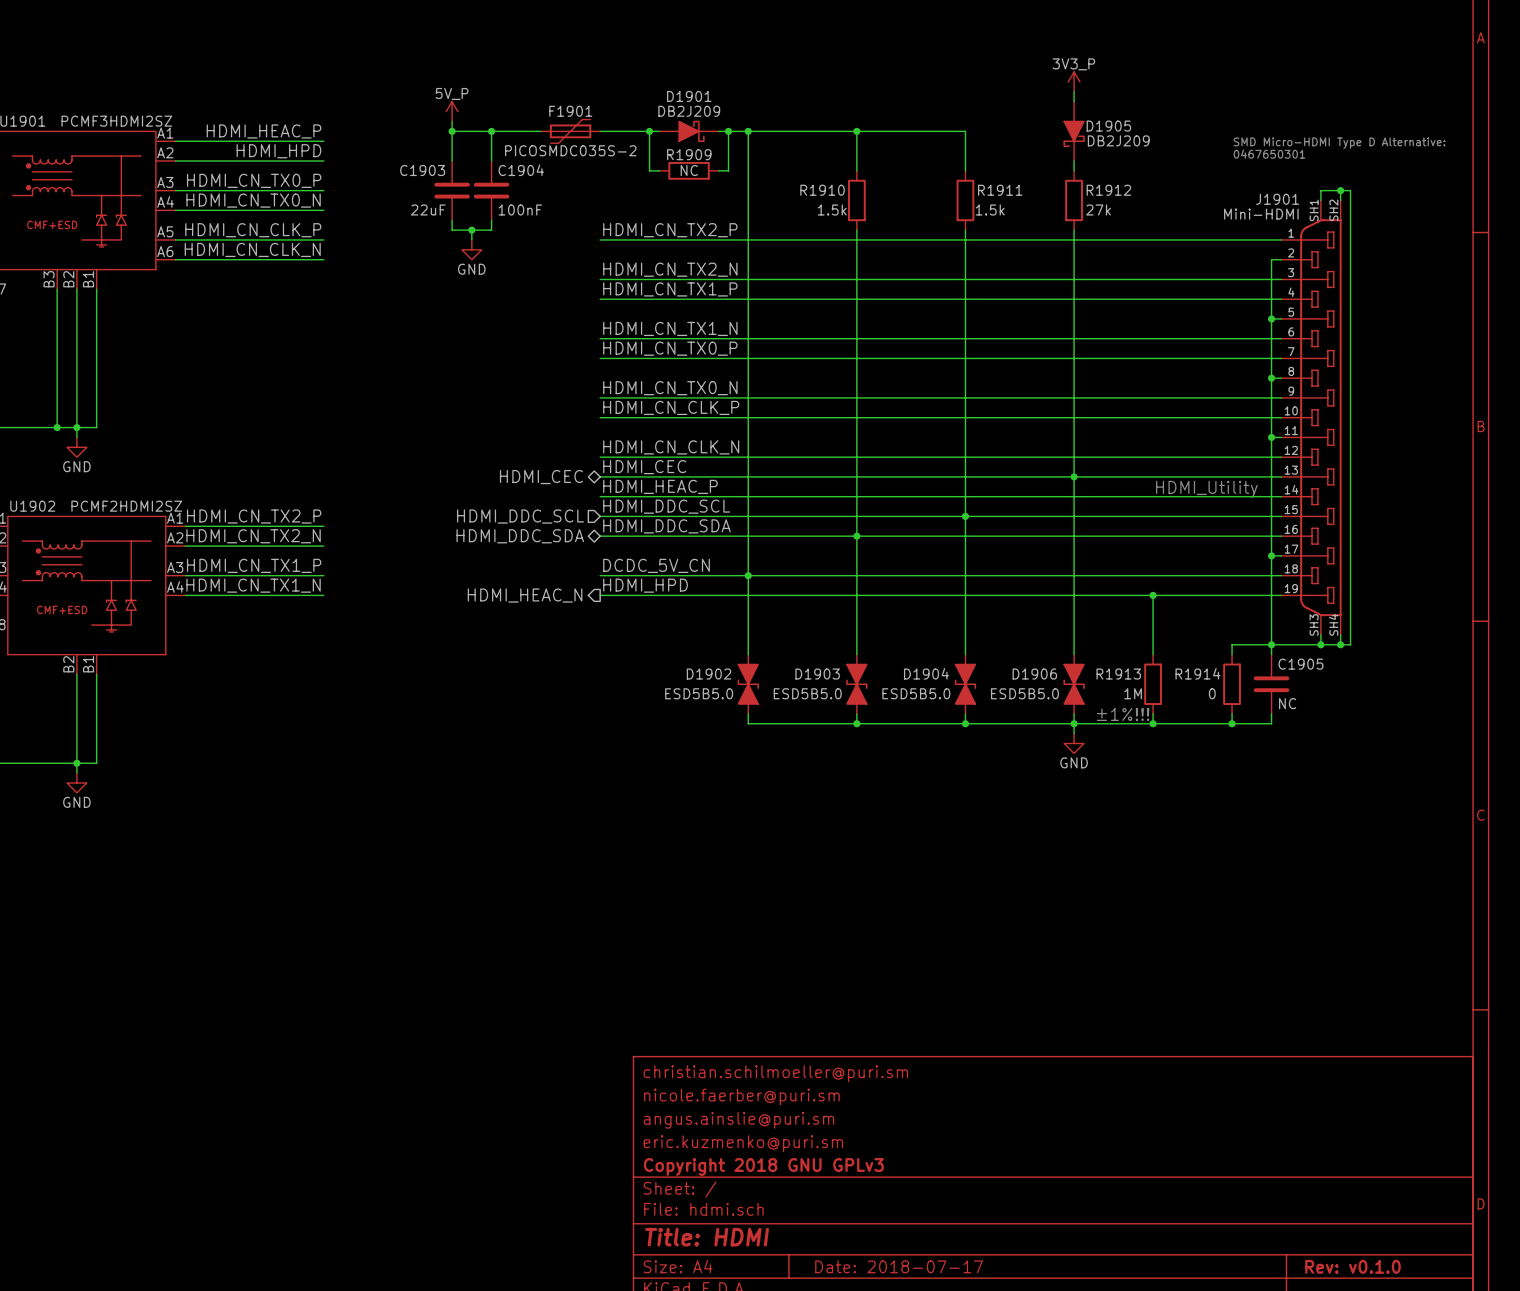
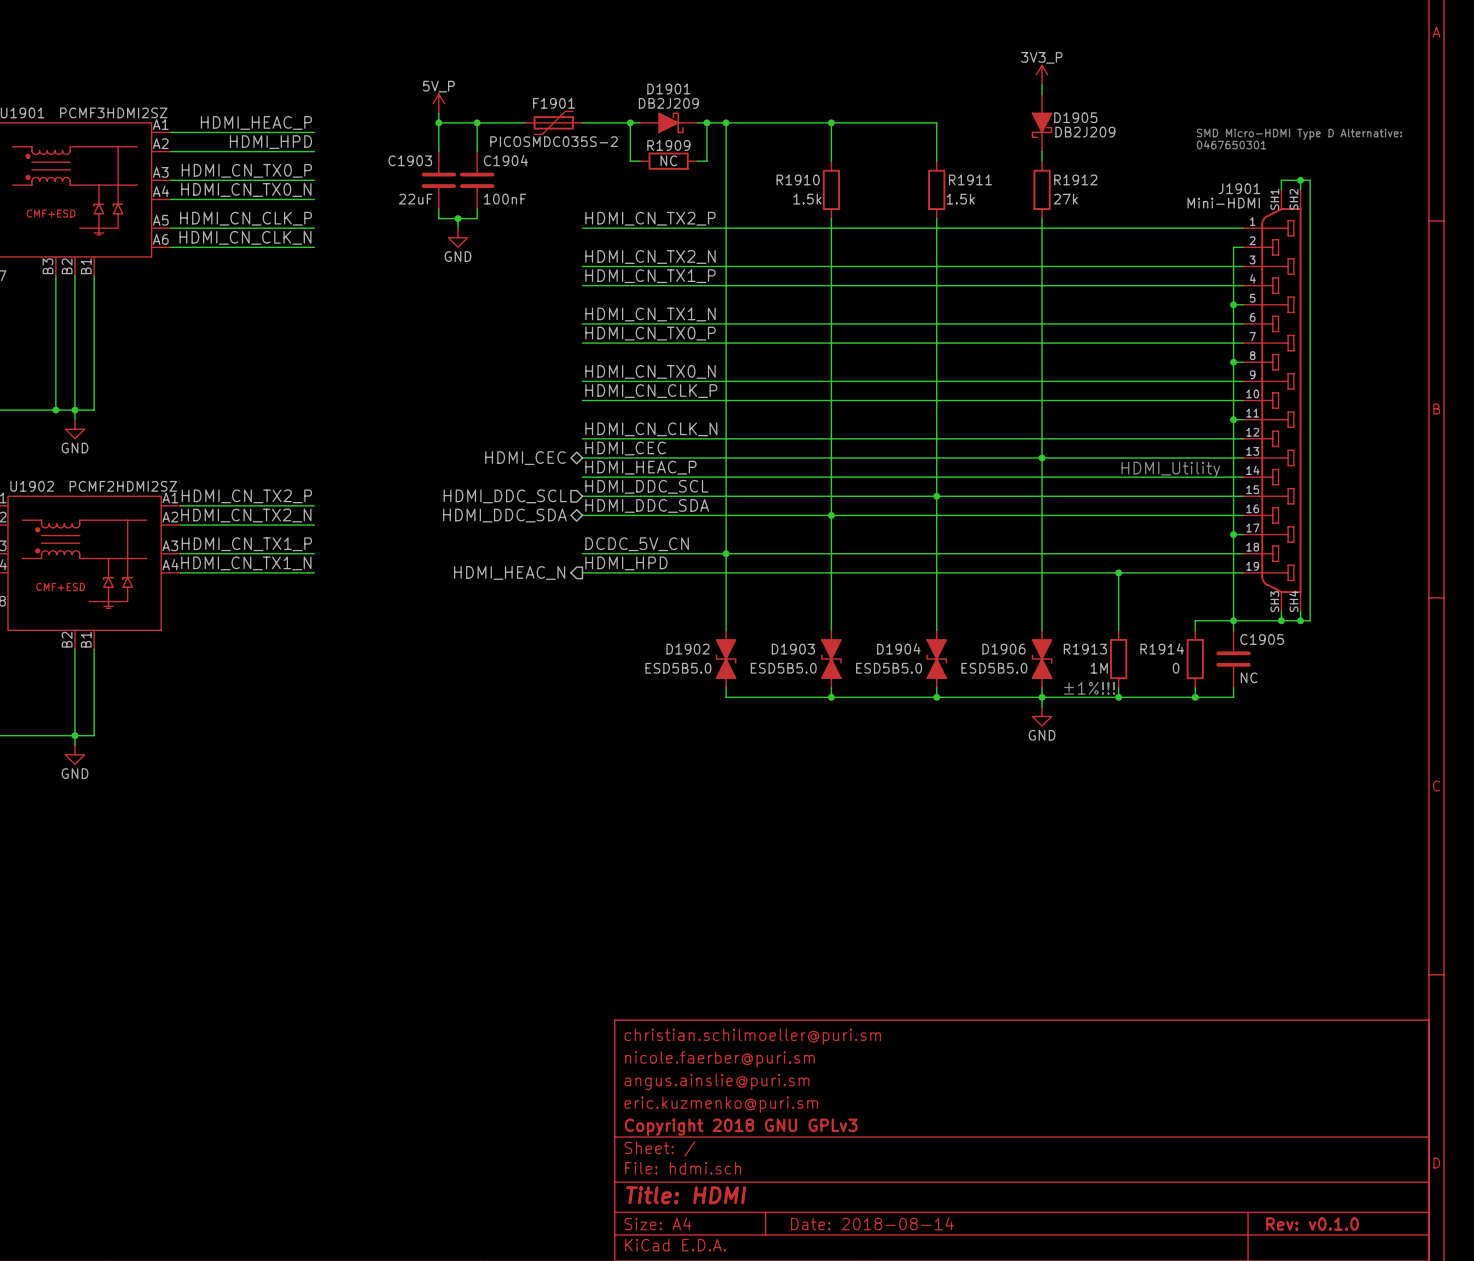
title block: Date: 2018-07-17 (899, 1266) -> Date: 2018-08-14 (872, 1223)

